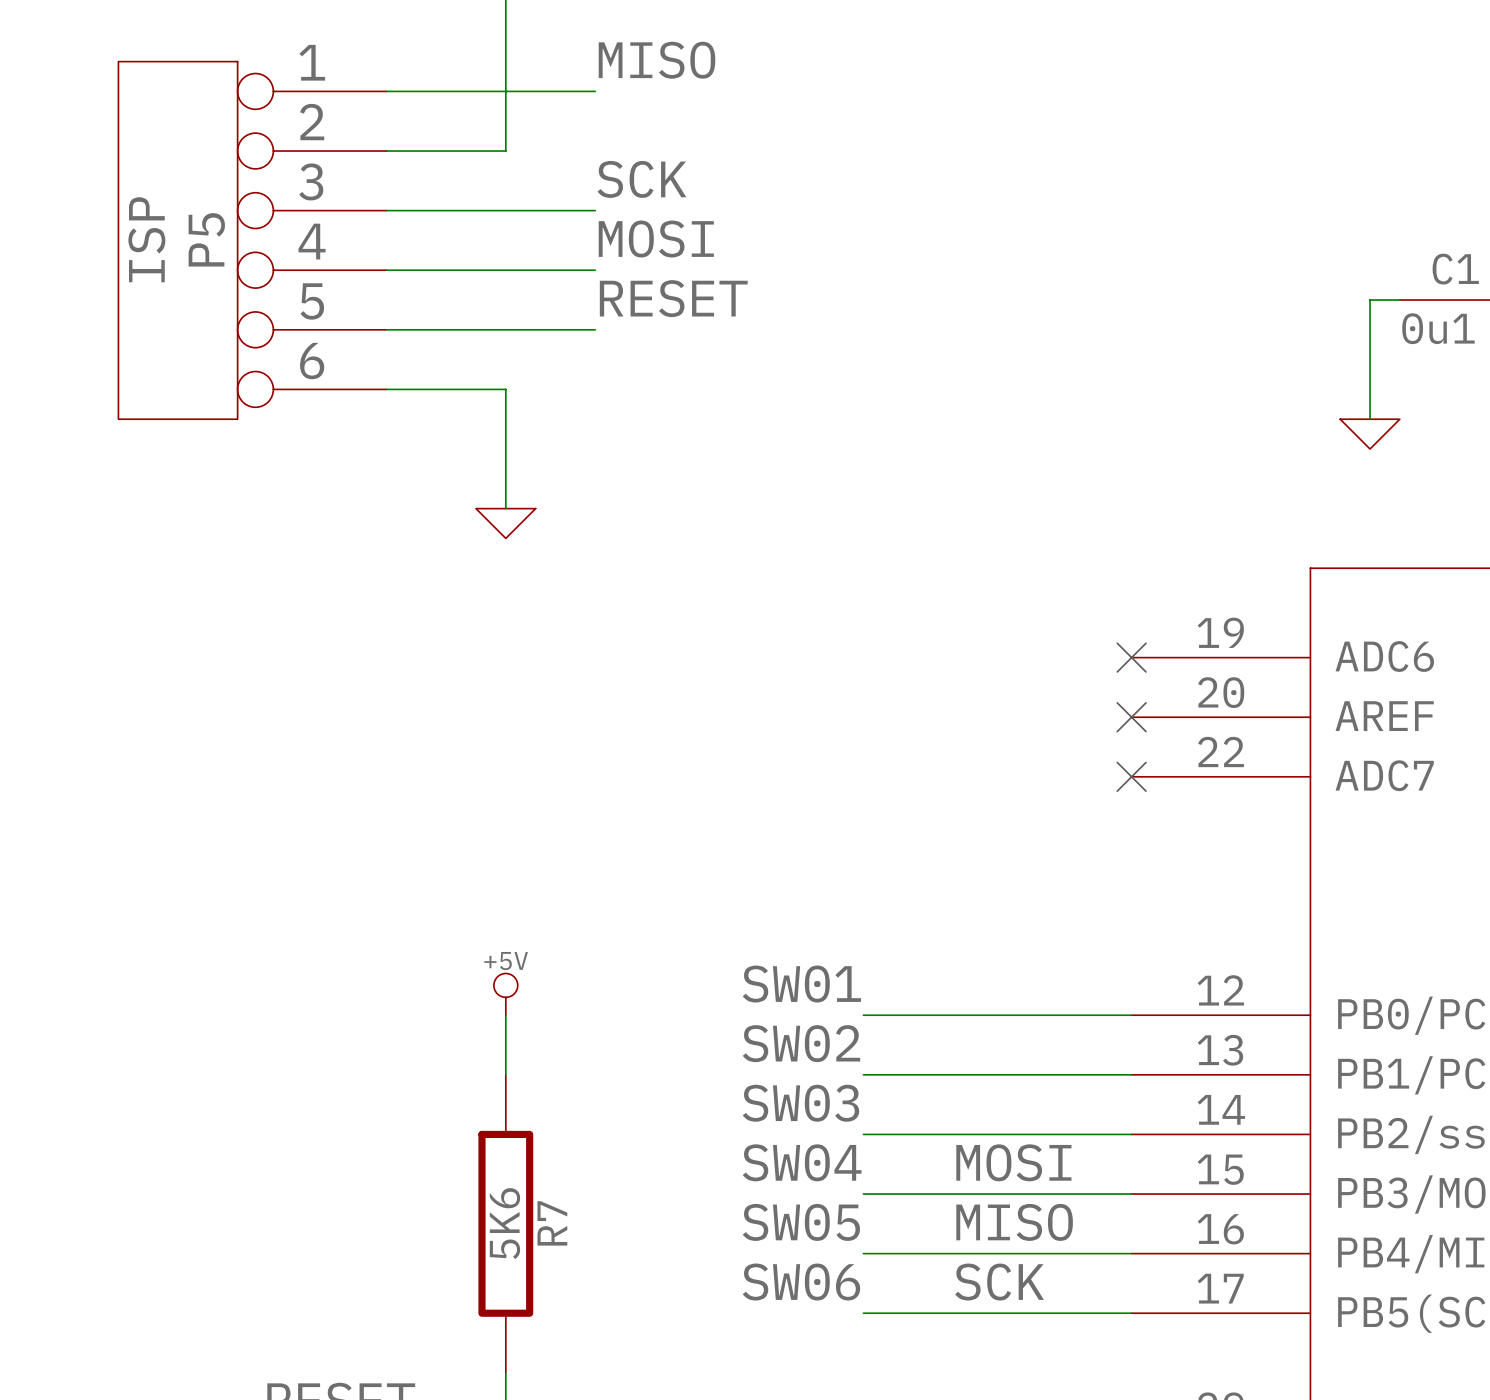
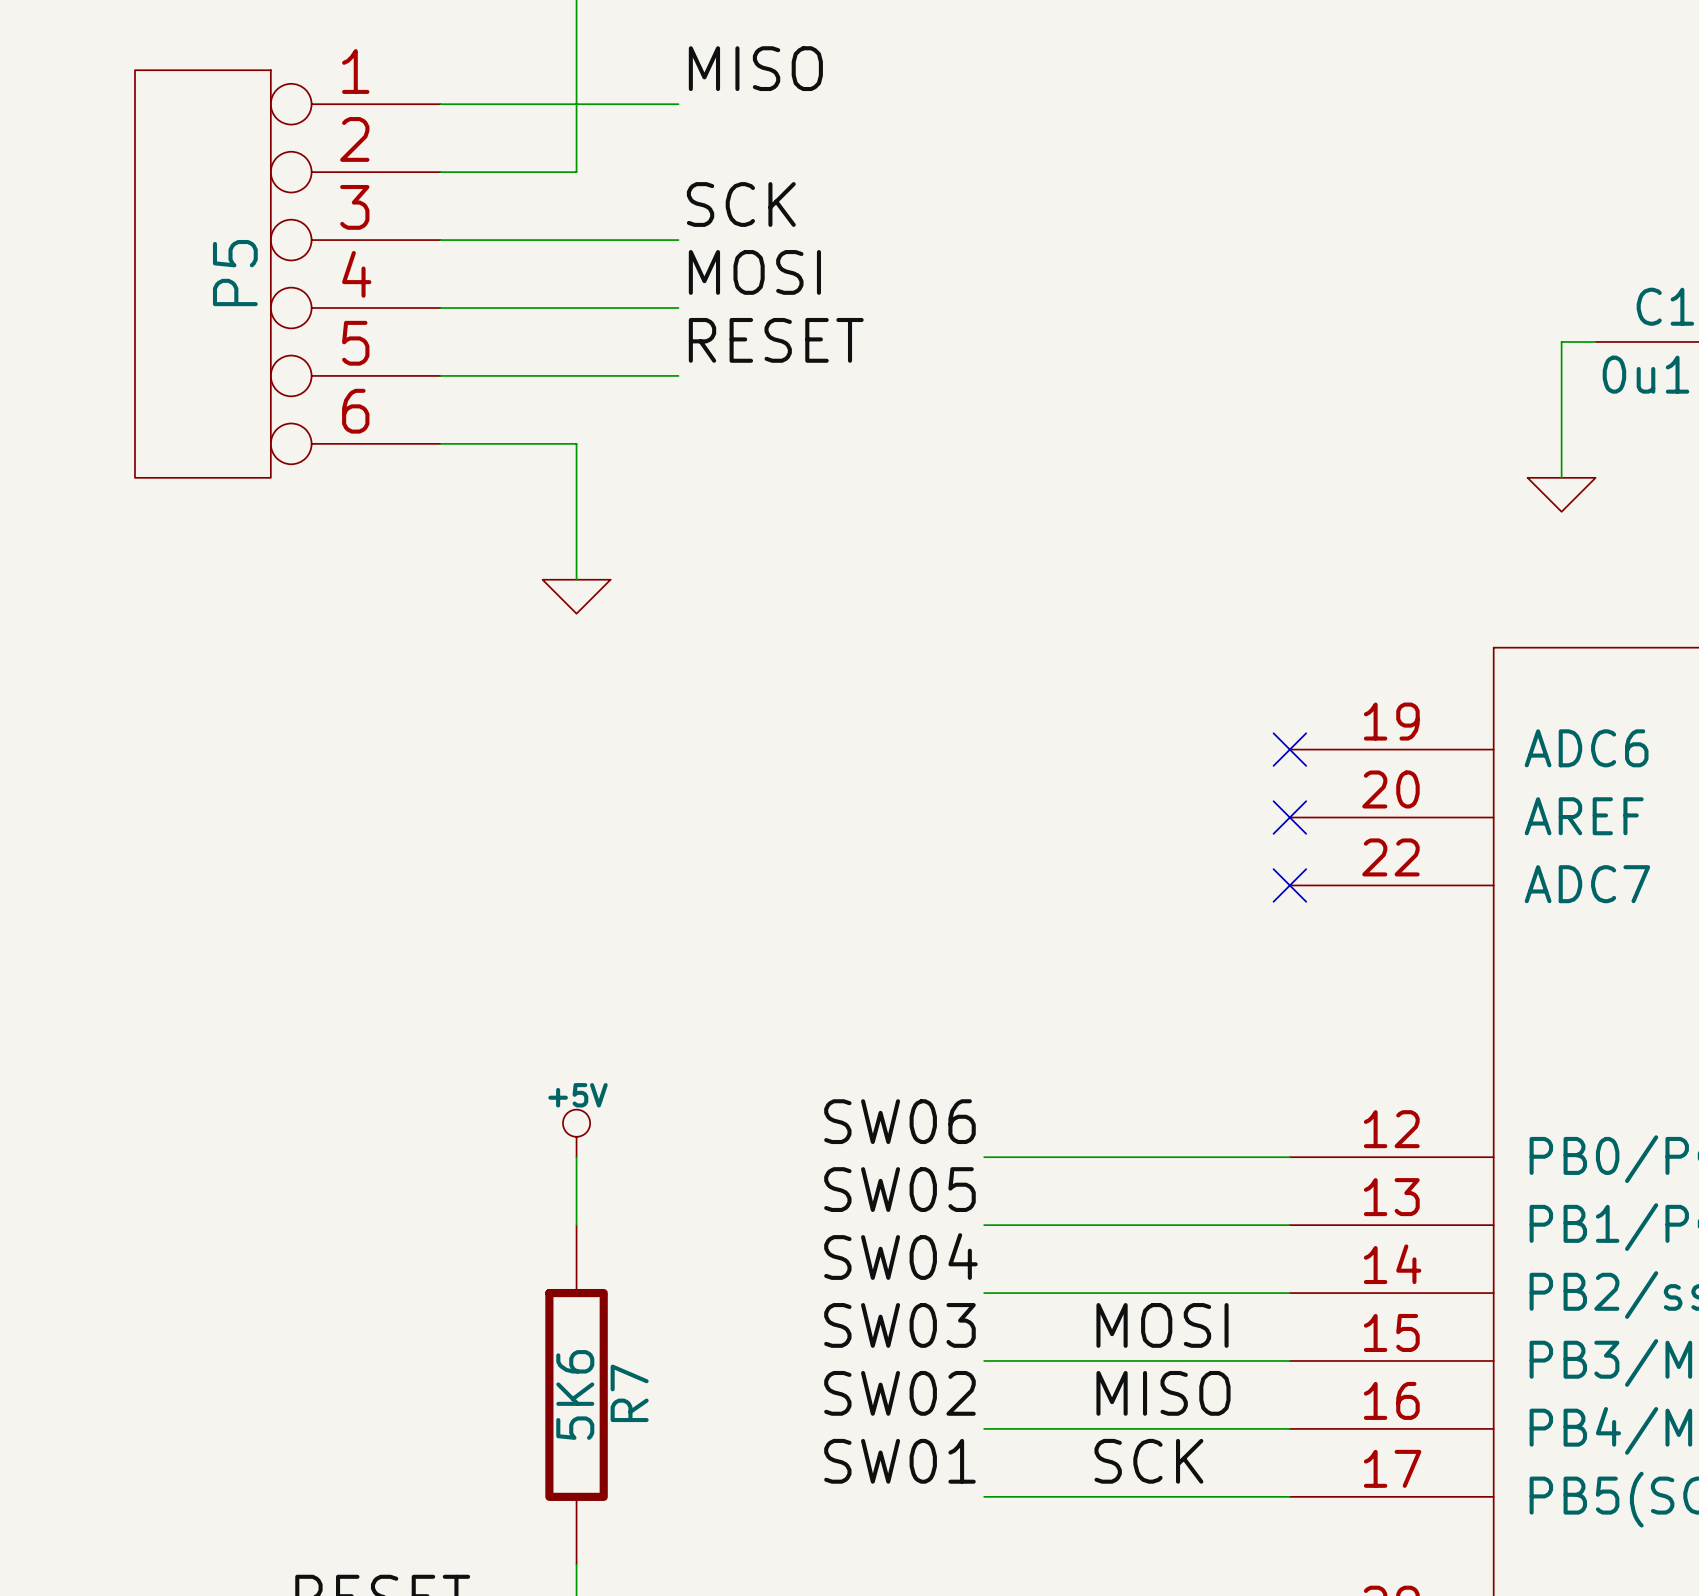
P5 value: ISP (146, 239) -> none
label: SW01 (801, 984) -> SW06 (899, 1121)
label: SW02 (801, 1043) -> SW05 (899, 1189)
label: SW03 (800, 1103) -> SW04 (900, 1256)
label: SW04 (802, 1162) -> SW03 (899, 1325)
label: SW05 (801, 1222) -> SW02 (899, 1393)
label: SW06 (801, 1282) -> SW01 (899, 1461)

